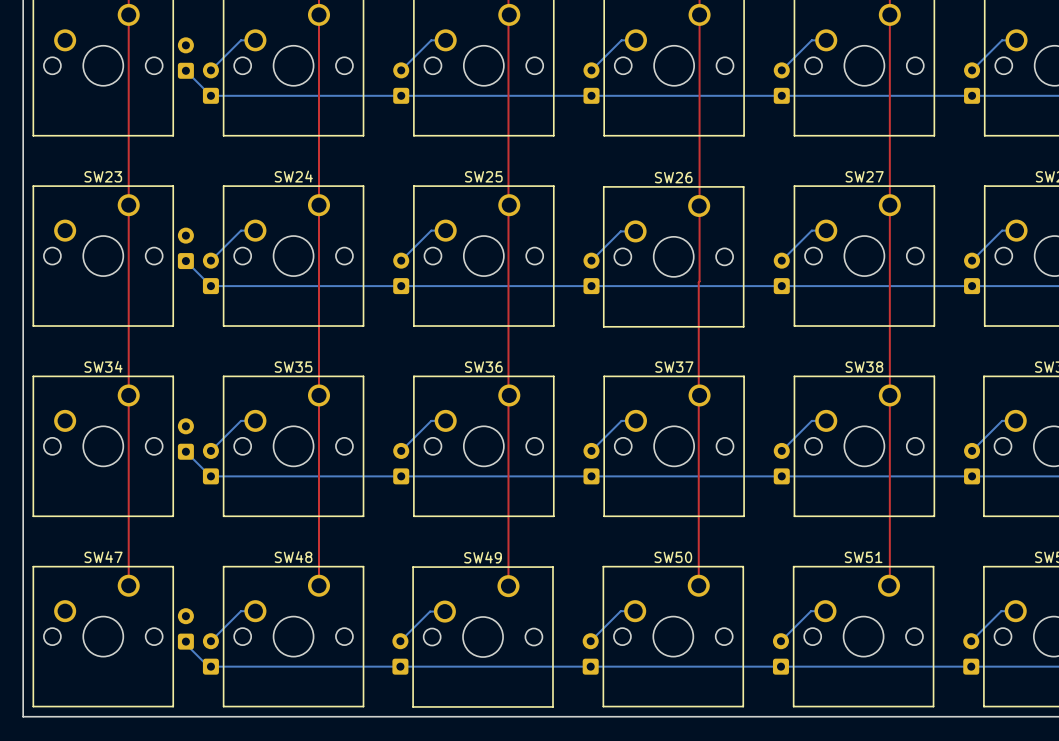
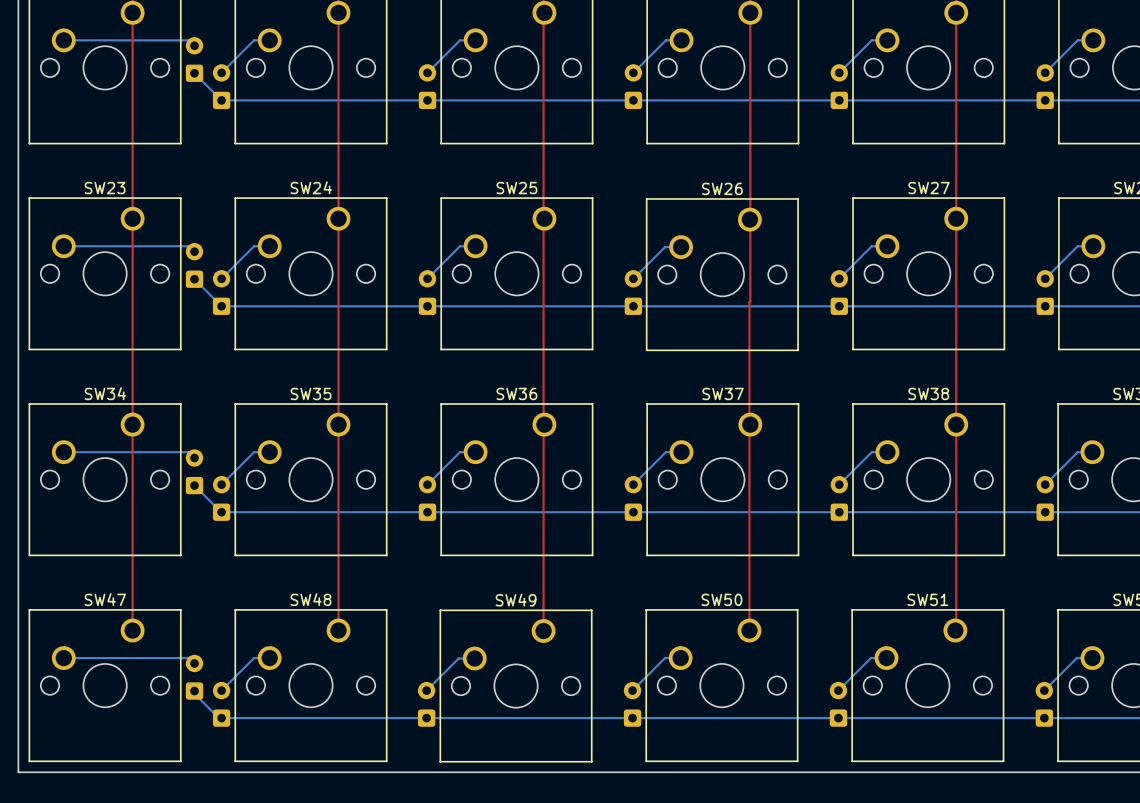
bottom track: none -> (63, 40) (189, 40) (194, 45)
bottom track: none -> (63, 246) (189, 246) (194, 251)
bottom track: none -> (63, 452) (188, 452) (194, 458)
bottom track: none -> (63, 658) (189, 658) (194, 663)

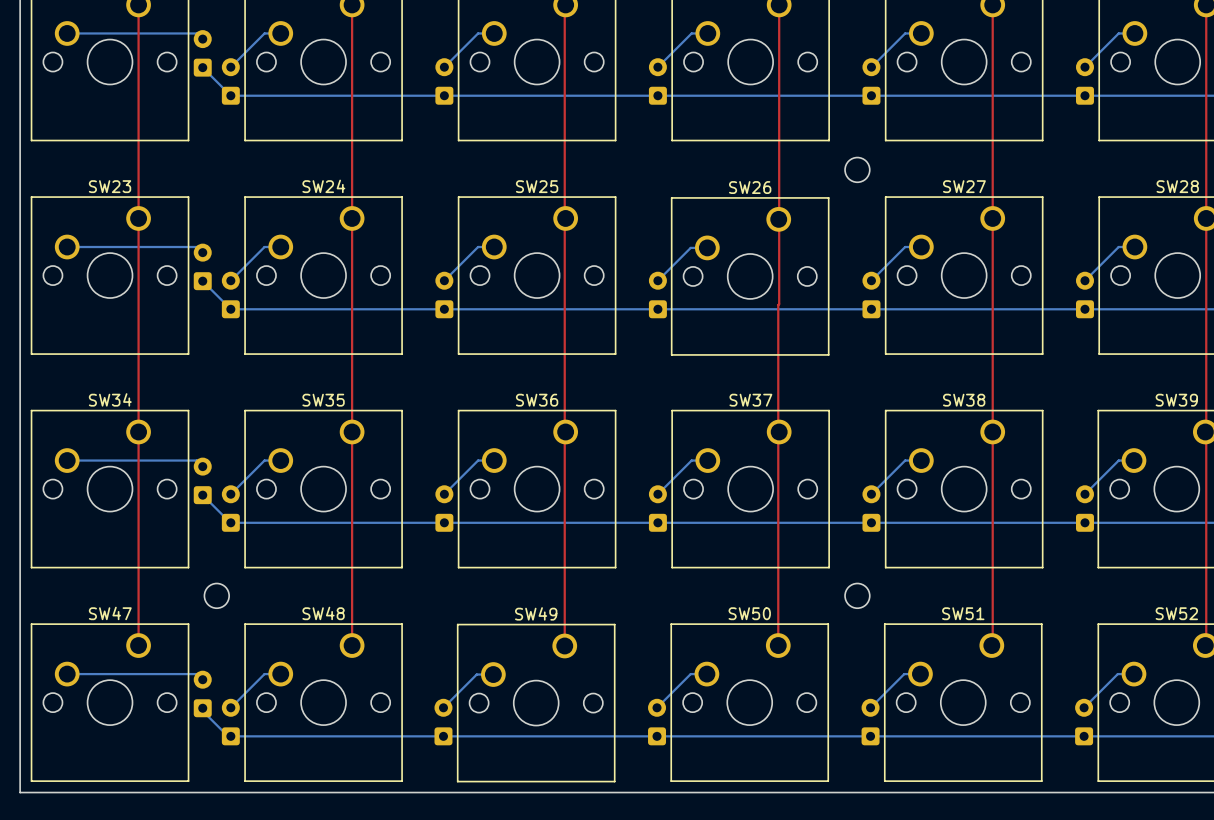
round board edge: none -> [844, 157, 871, 183]
round board edge: none -> [204, 583, 230, 609]
round board edge: none -> [844, 583, 871, 609]

